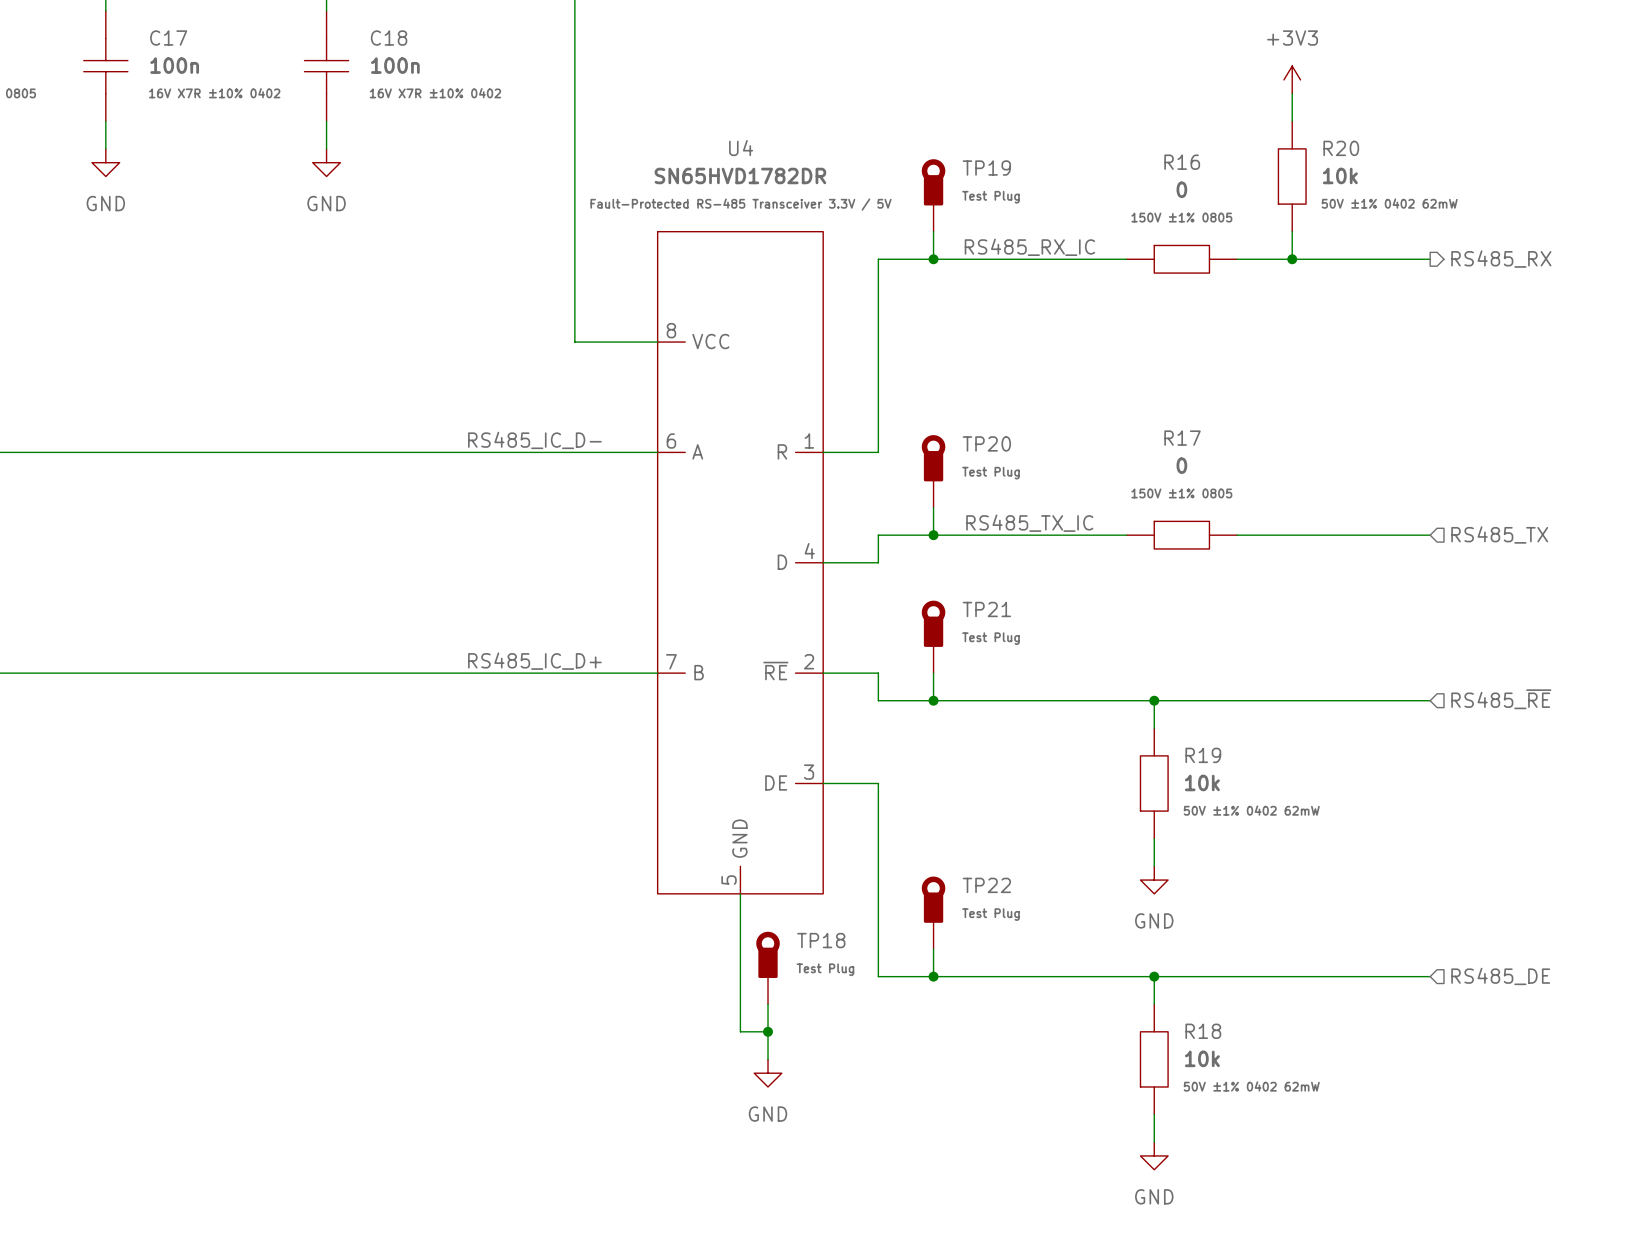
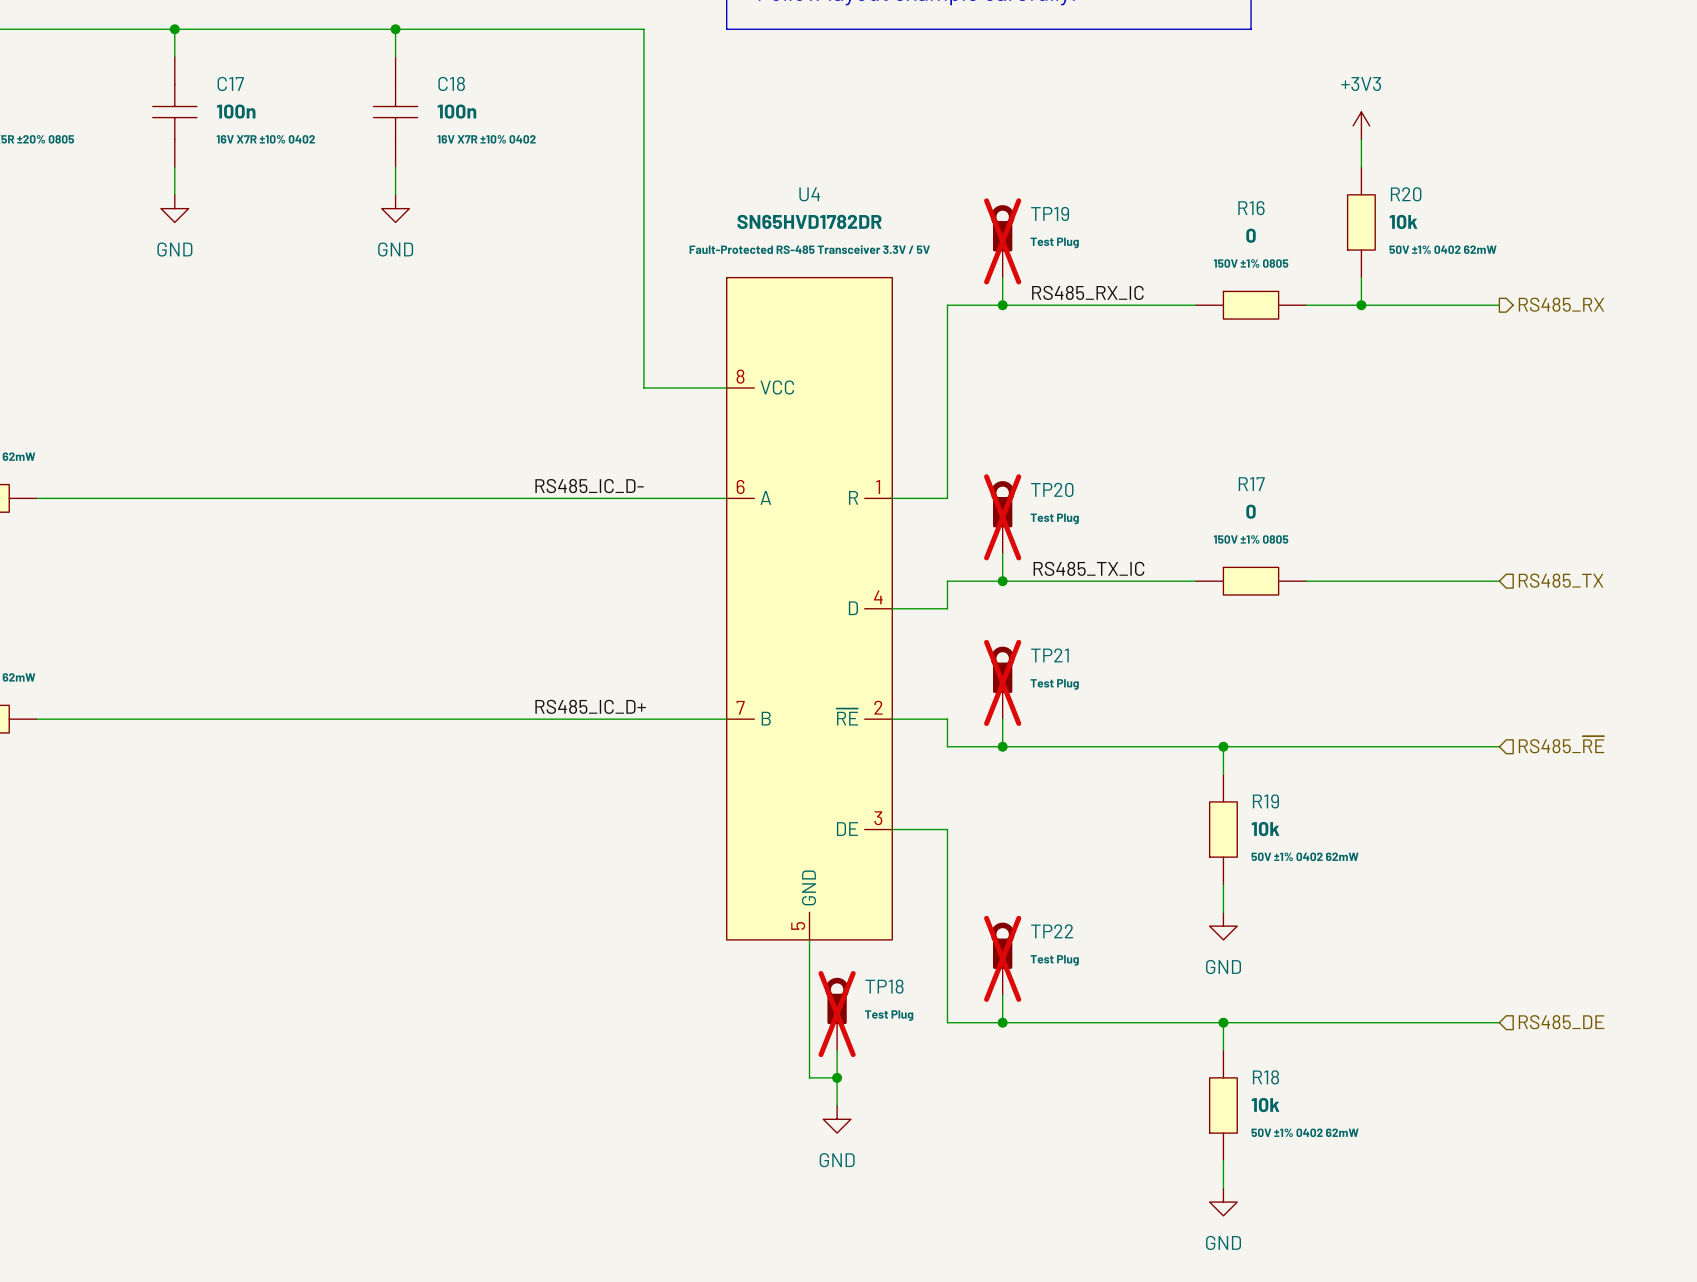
TP19 do-not-place cross: none -> (1002, 241)
TP20 do-not-place cross: none -> (1002, 517)
TP21 do-not-place cross: none -> (1002, 682)
TP22 do-not-place cross: none -> (1002, 958)
TP18 do-not-place cross: none -> (837, 1014)

